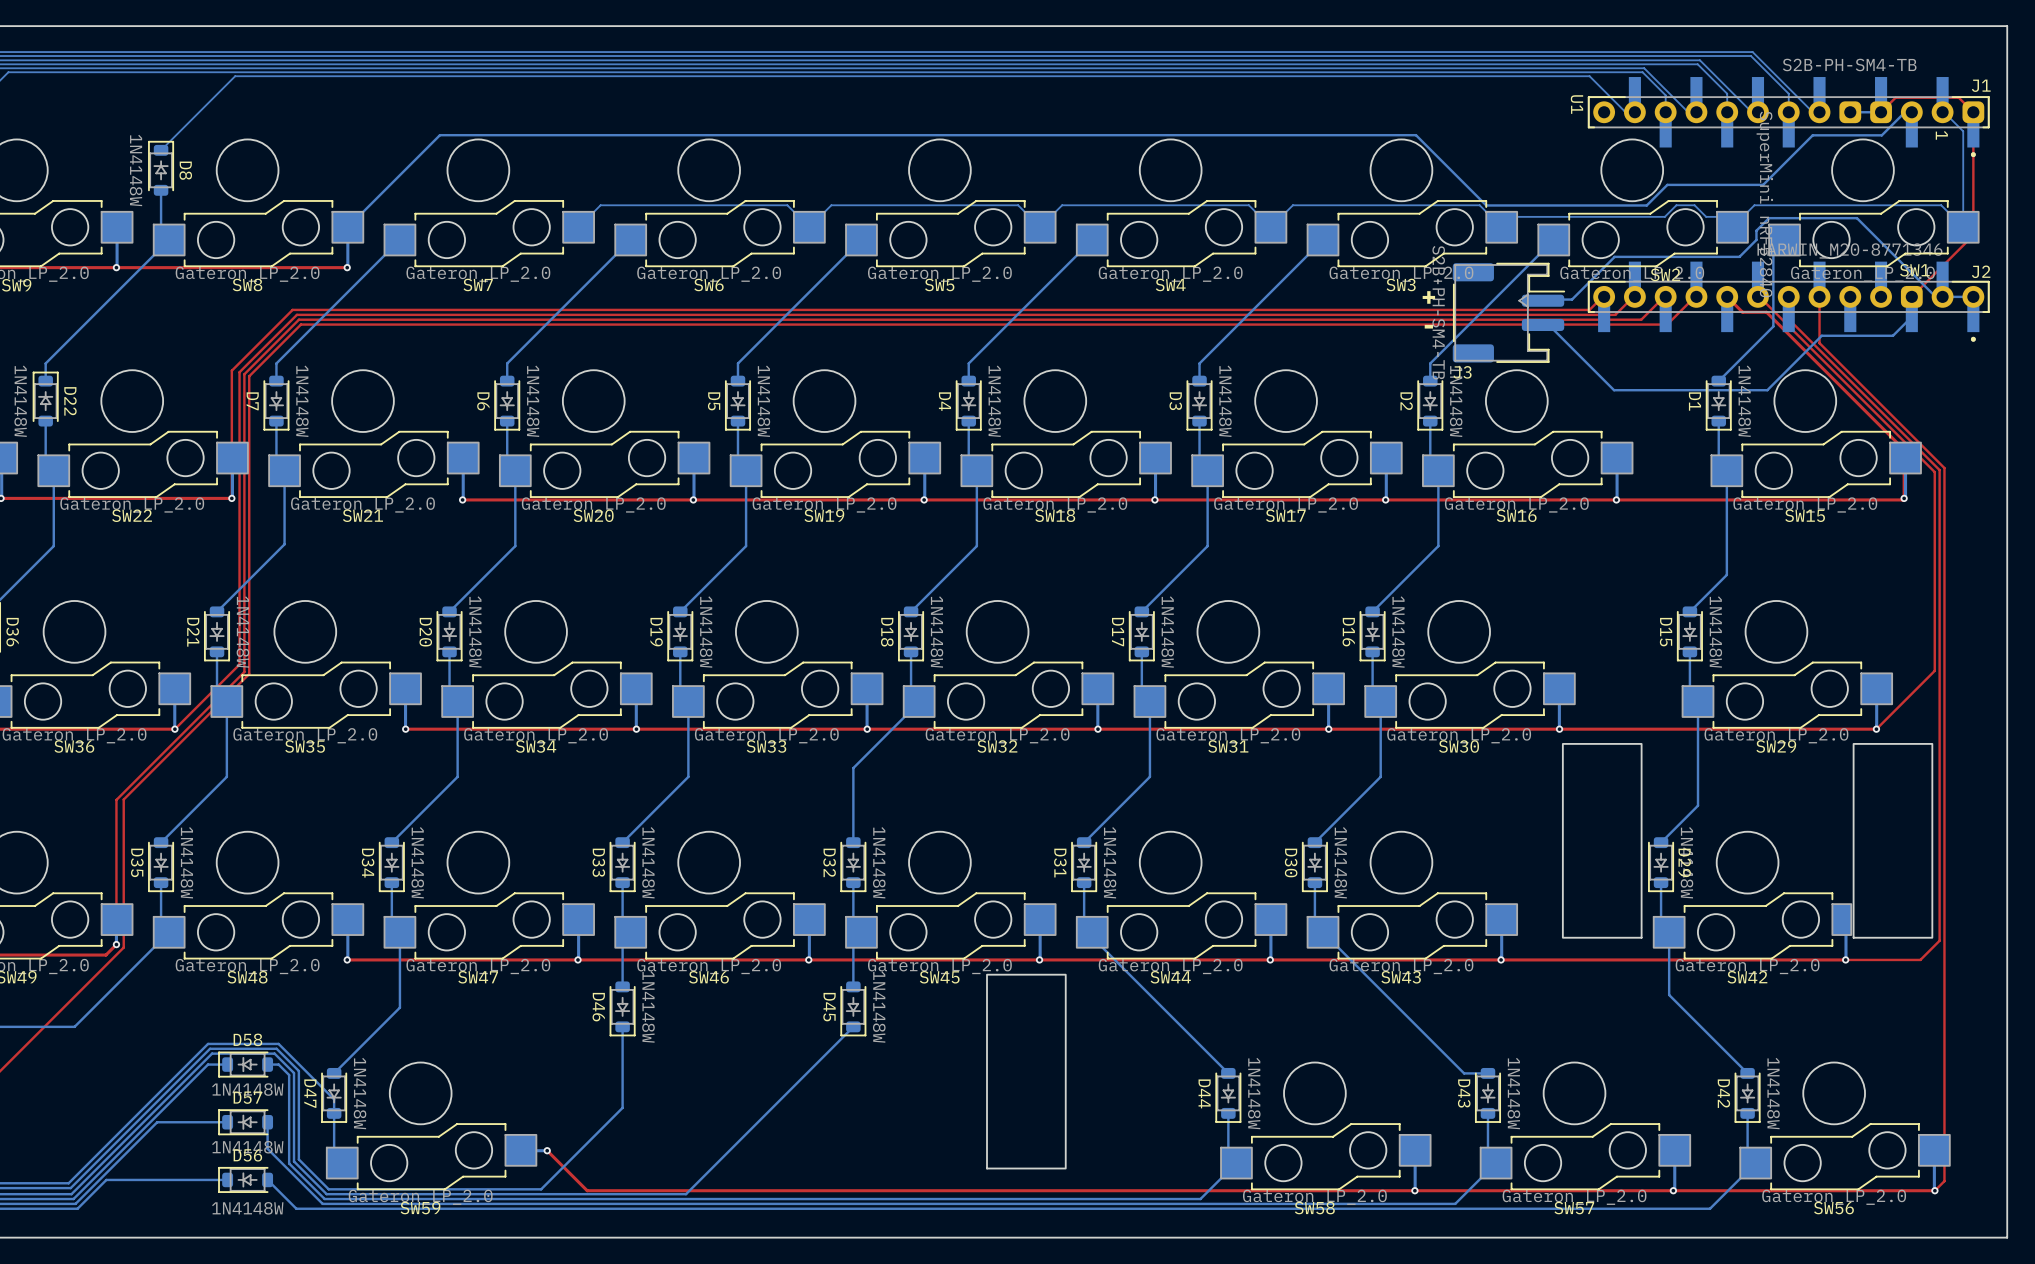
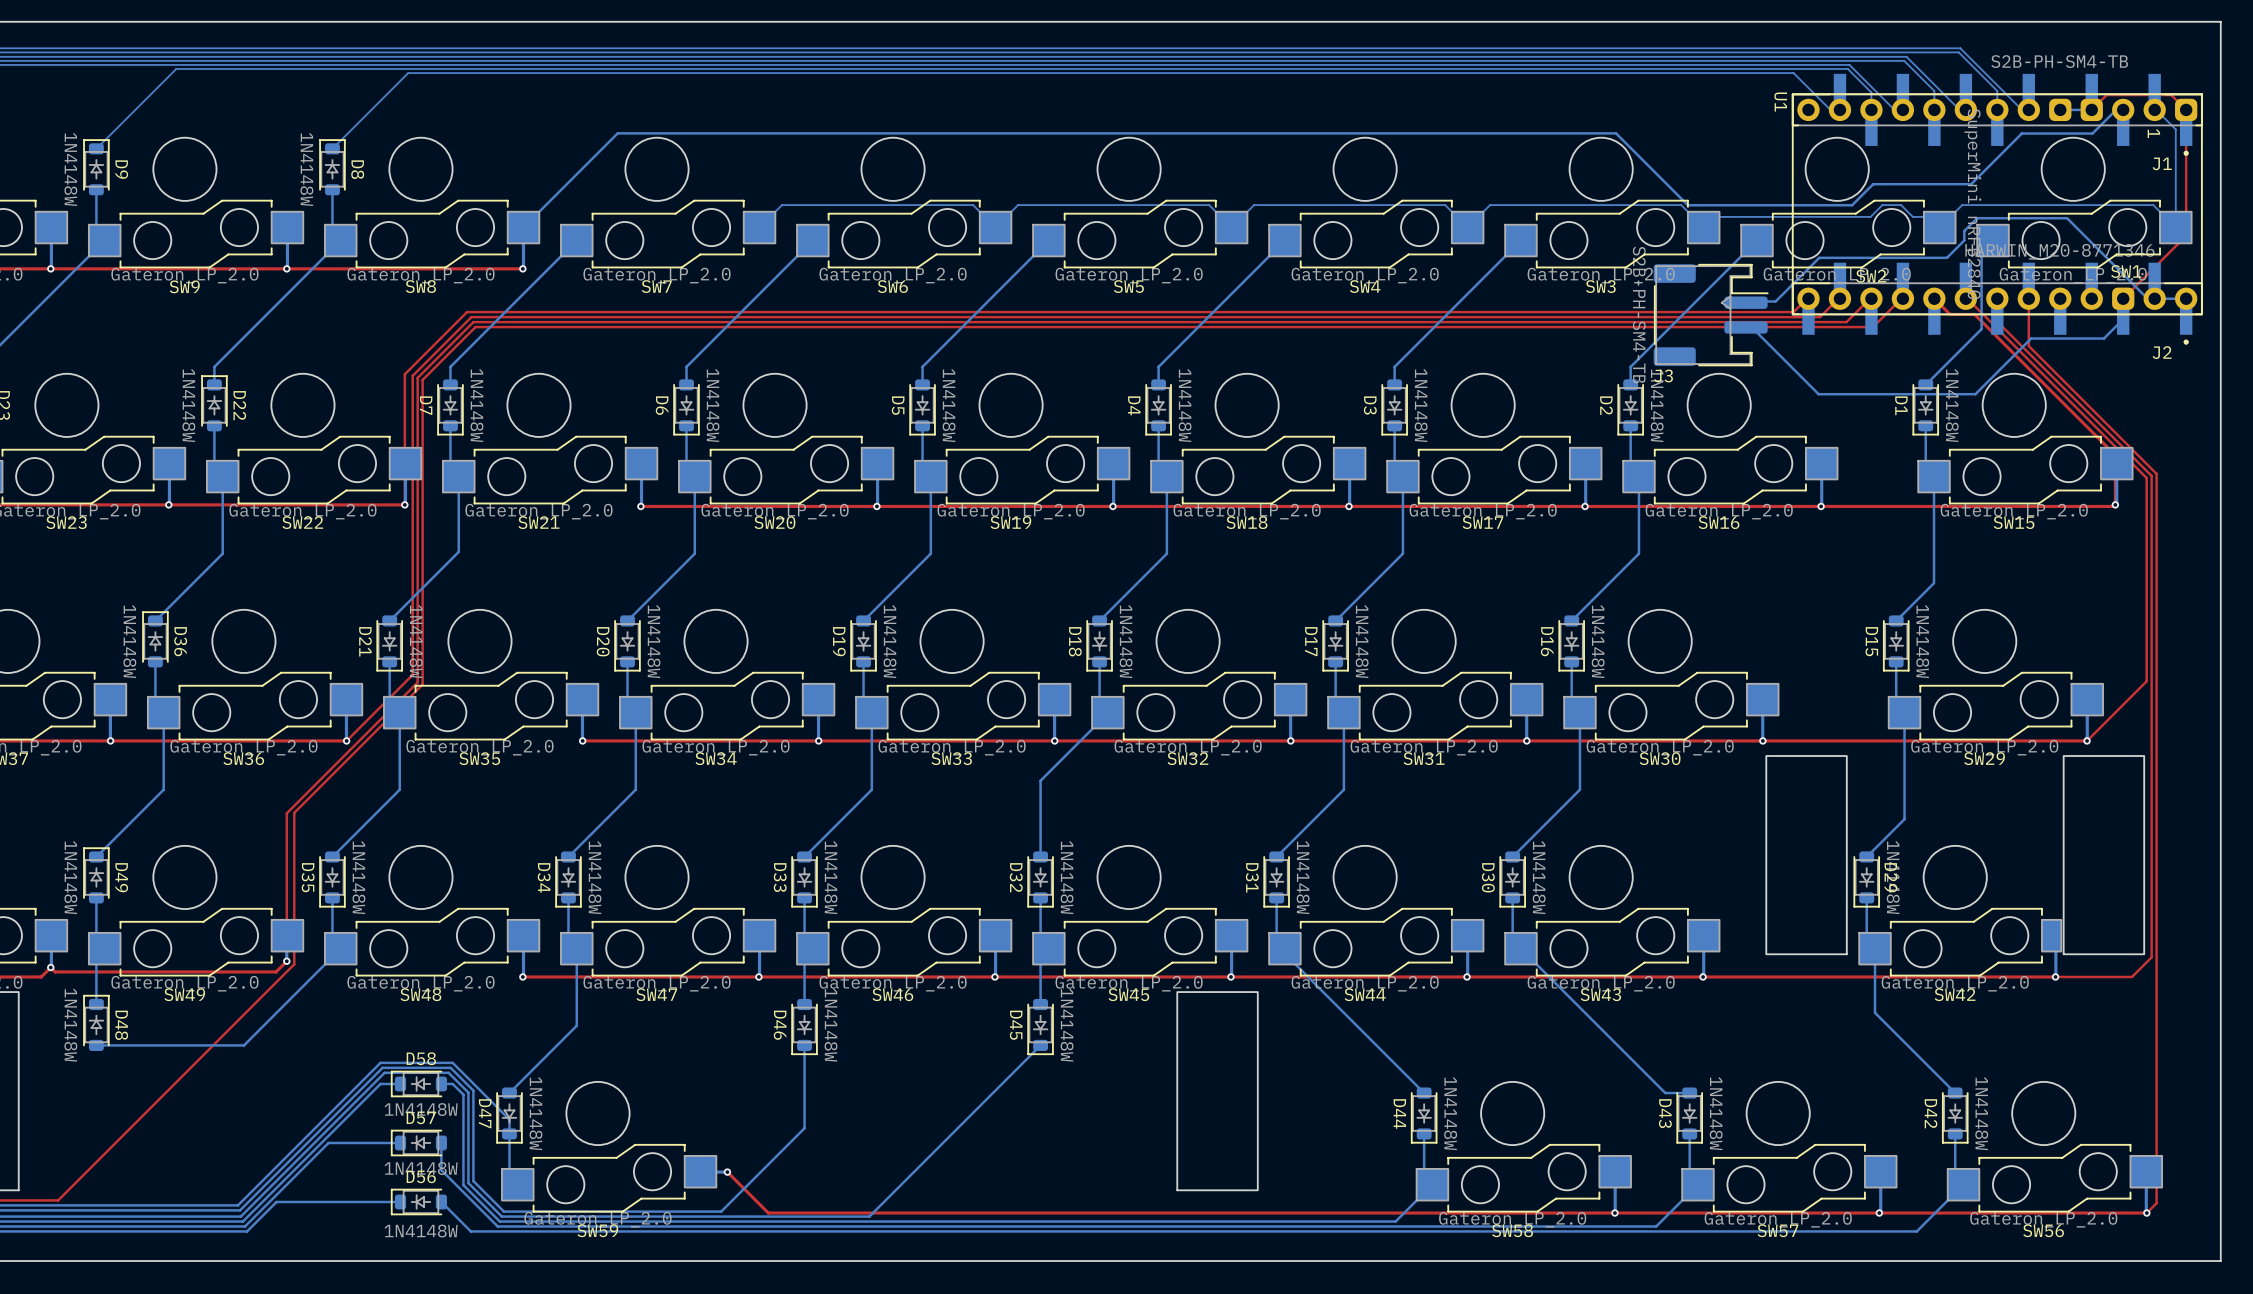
J1 name position: J1 (1981, 85) -> J1 (2162, 163)
U1 footprint: [1593, 101, 1985, 308] -> [1791, 93, 2203, 316]
J2 name position: J2 (1981, 271) -> J2 (2162, 352)
text: + (1428, 297) -> none
text: - (1428, 326) -> none

